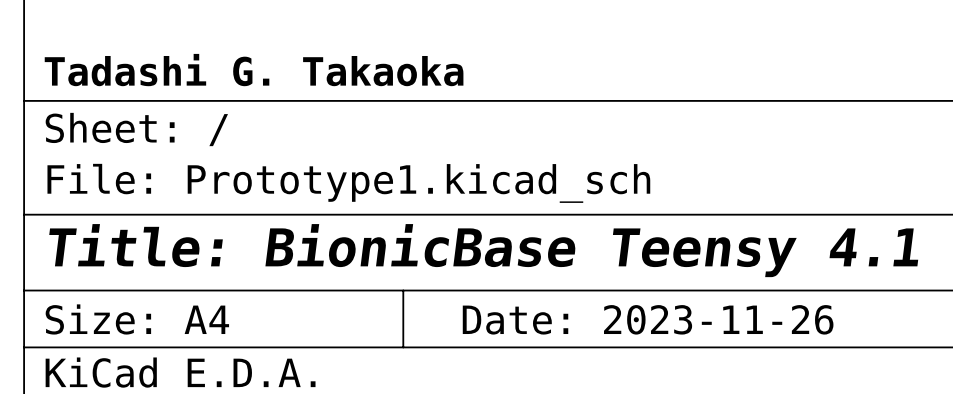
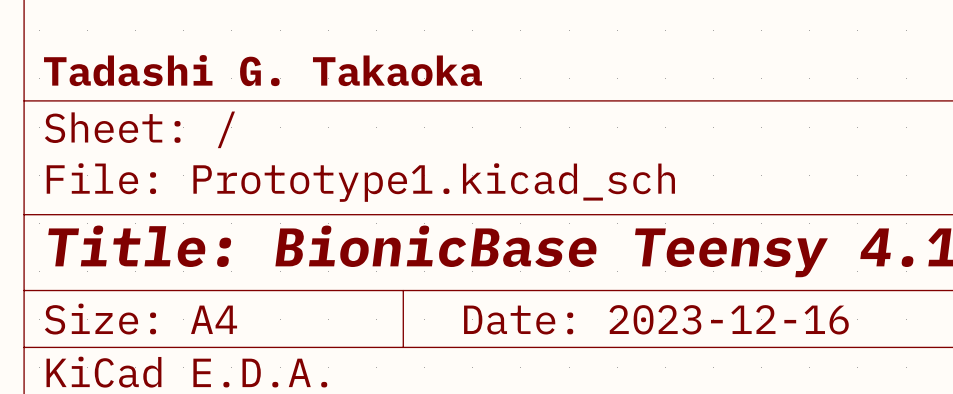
title block: Date: 2023-11-26 (648, 319) -> Date: 2023-12-16 (656, 319)

